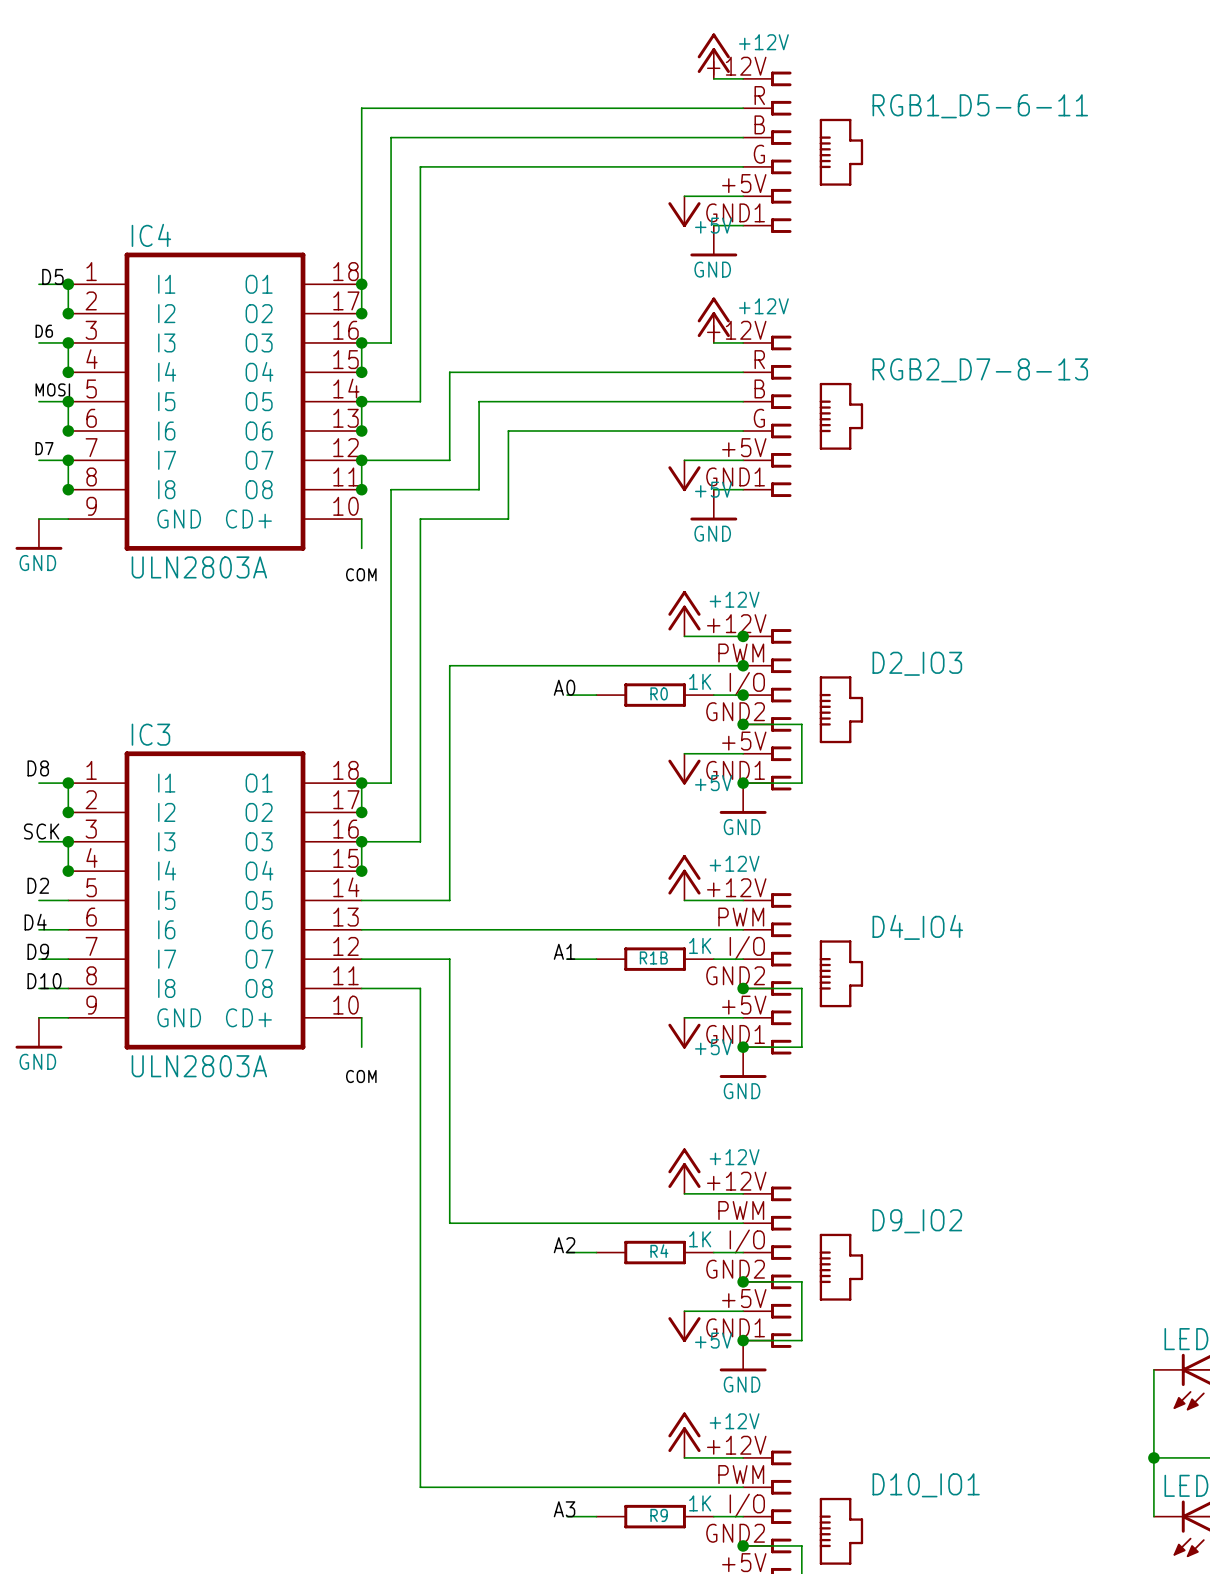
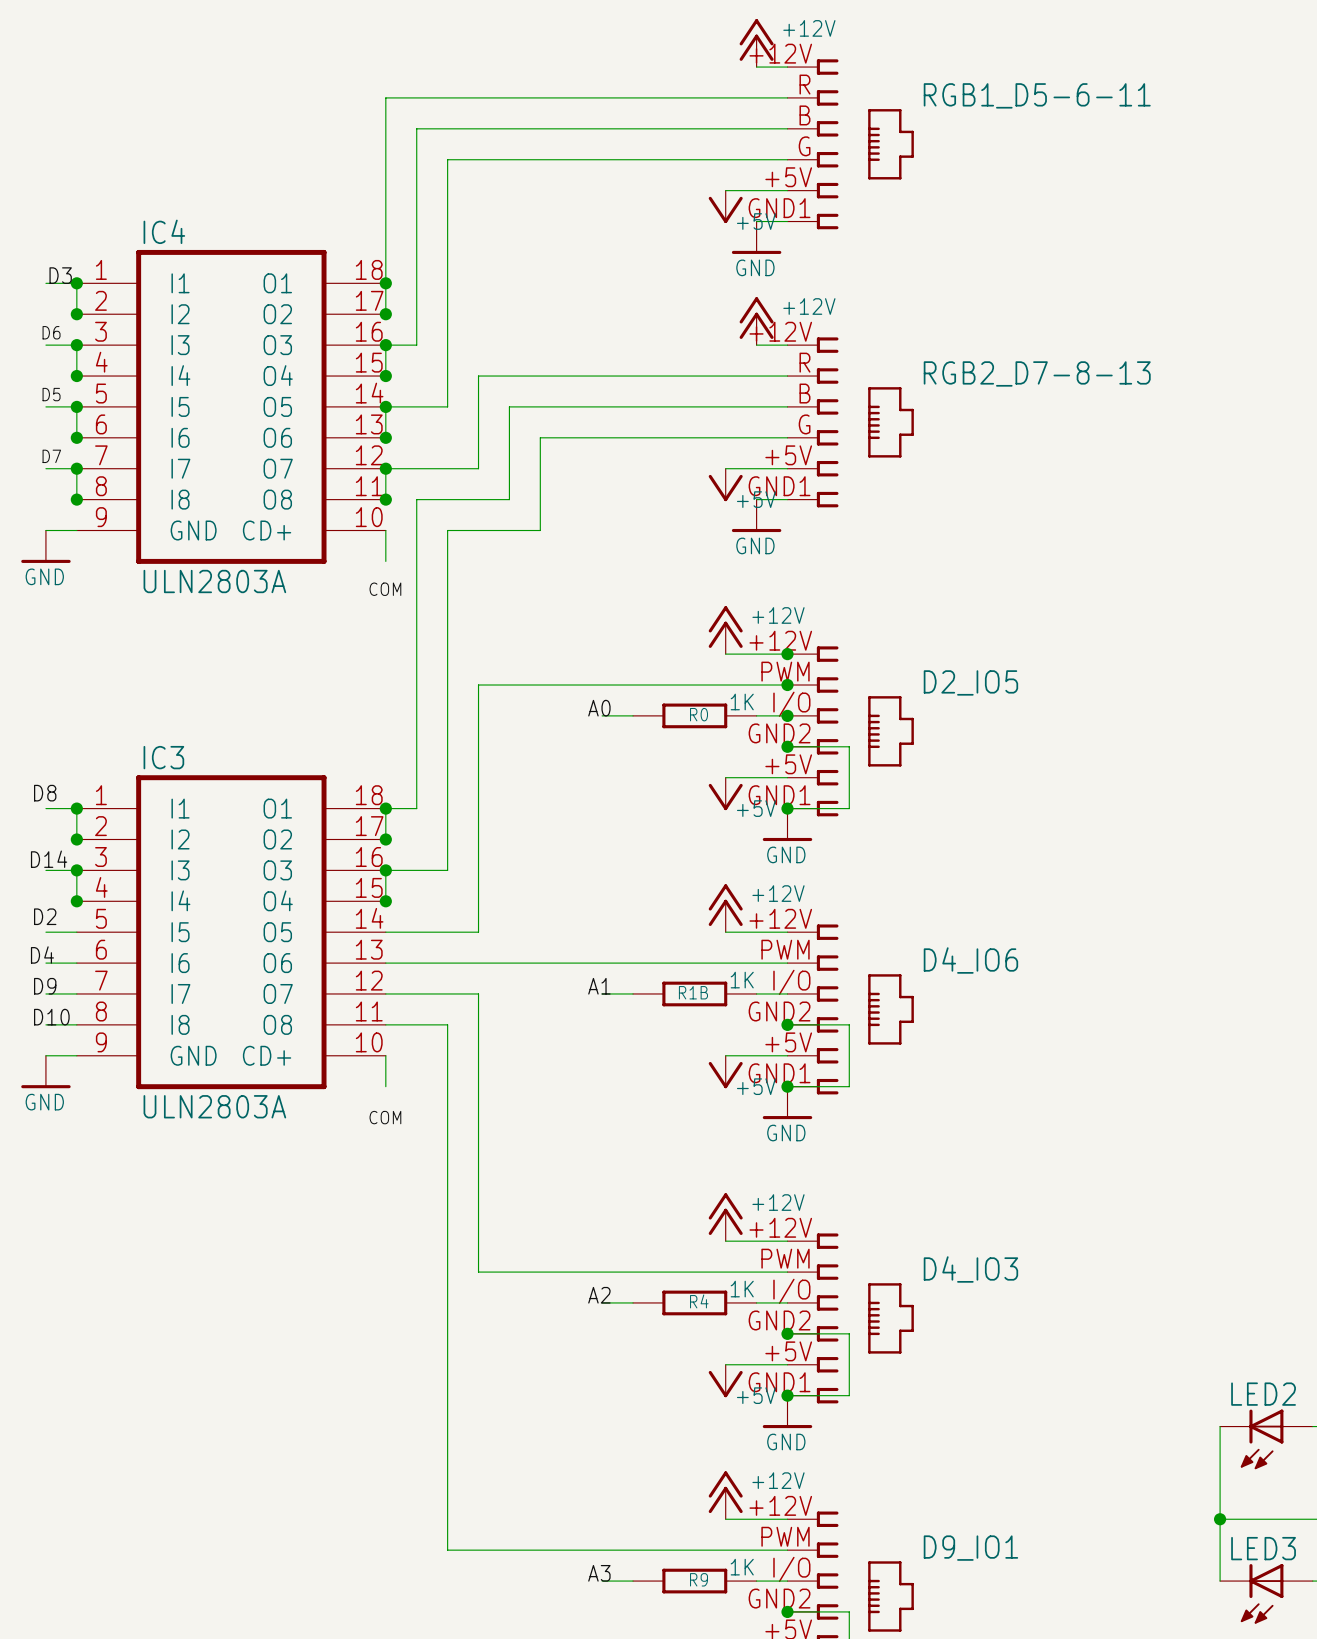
label: D5 (52, 276) -> D3 (60, 275)
label: MOSI (52, 389) -> D5 (51, 394)
D2_IO3 name: D2_IO3 (917, 663) -> D2_IO5 (970, 682)
label: SCK (41, 831) -> D14 (49, 859)
D4_IO4 name: D4_IO4 (917, 927) -> D4_IO6 (970, 960)
D9_IO2 name: D9_IO2 (917, 1221) -> D4_IO3 (970, 1269)
D10_IO1 name: D10_IO1 (926, 1485) -> D9_IO1 (970, 1548)

